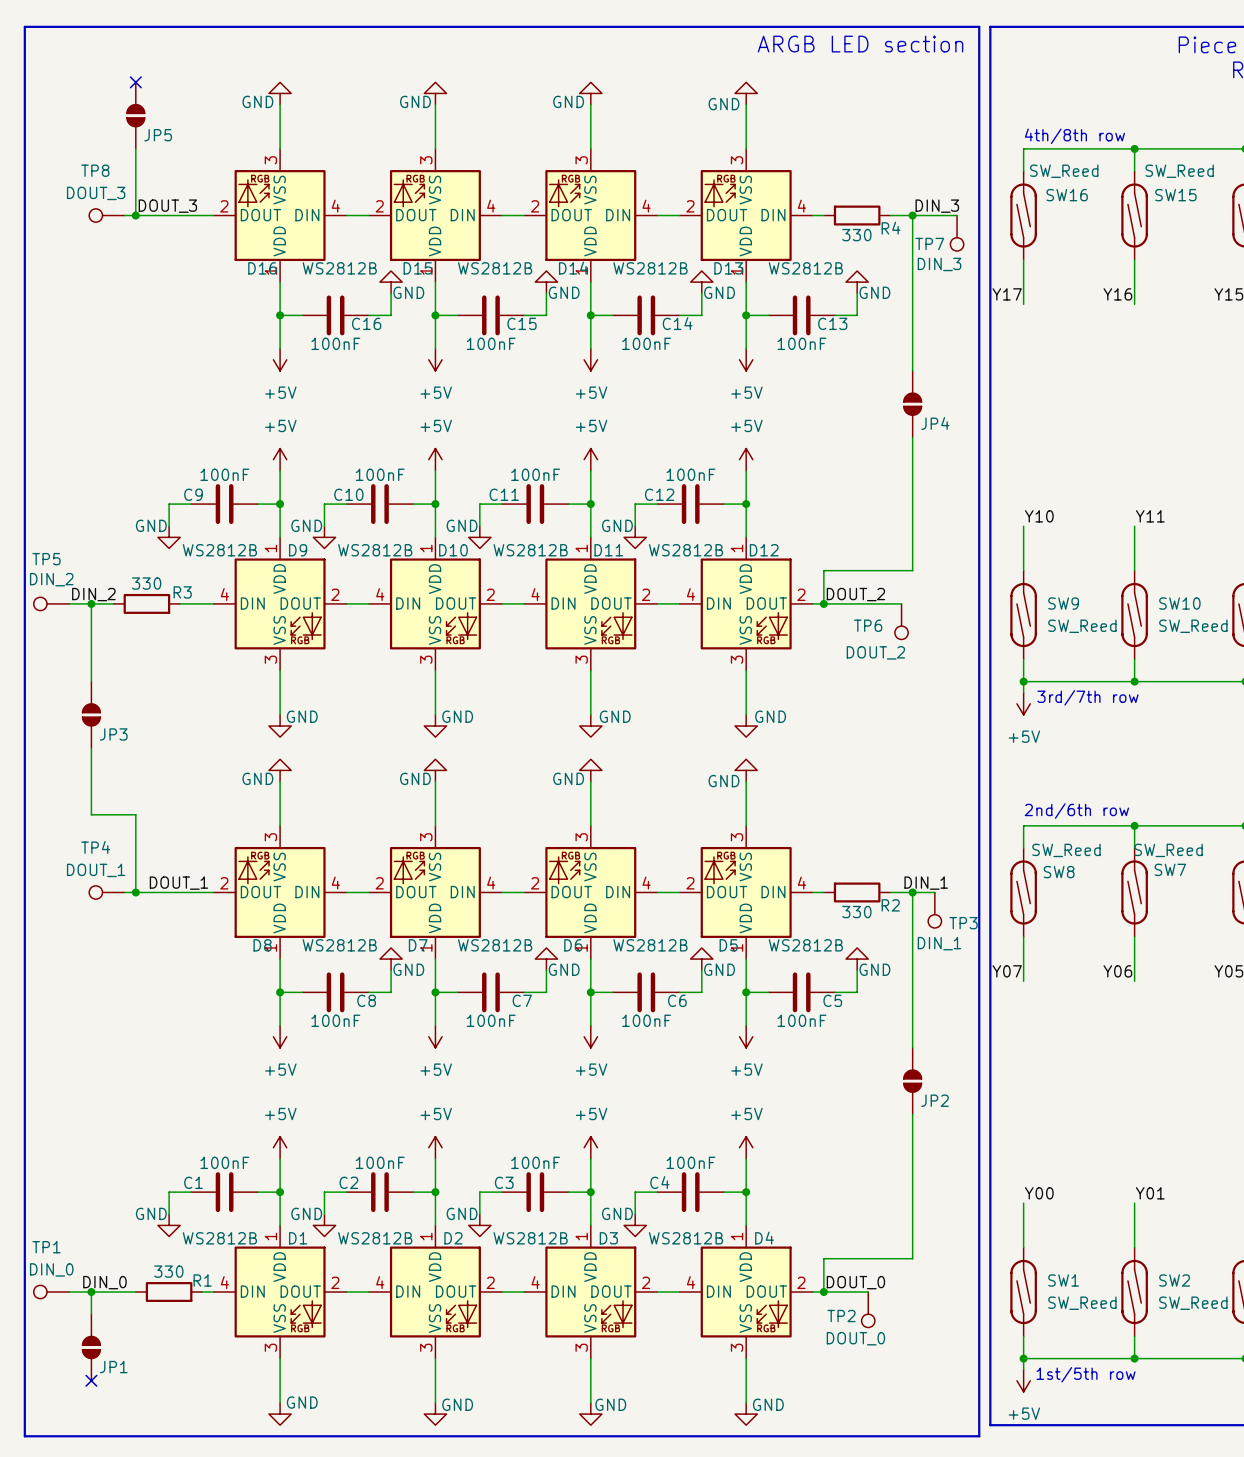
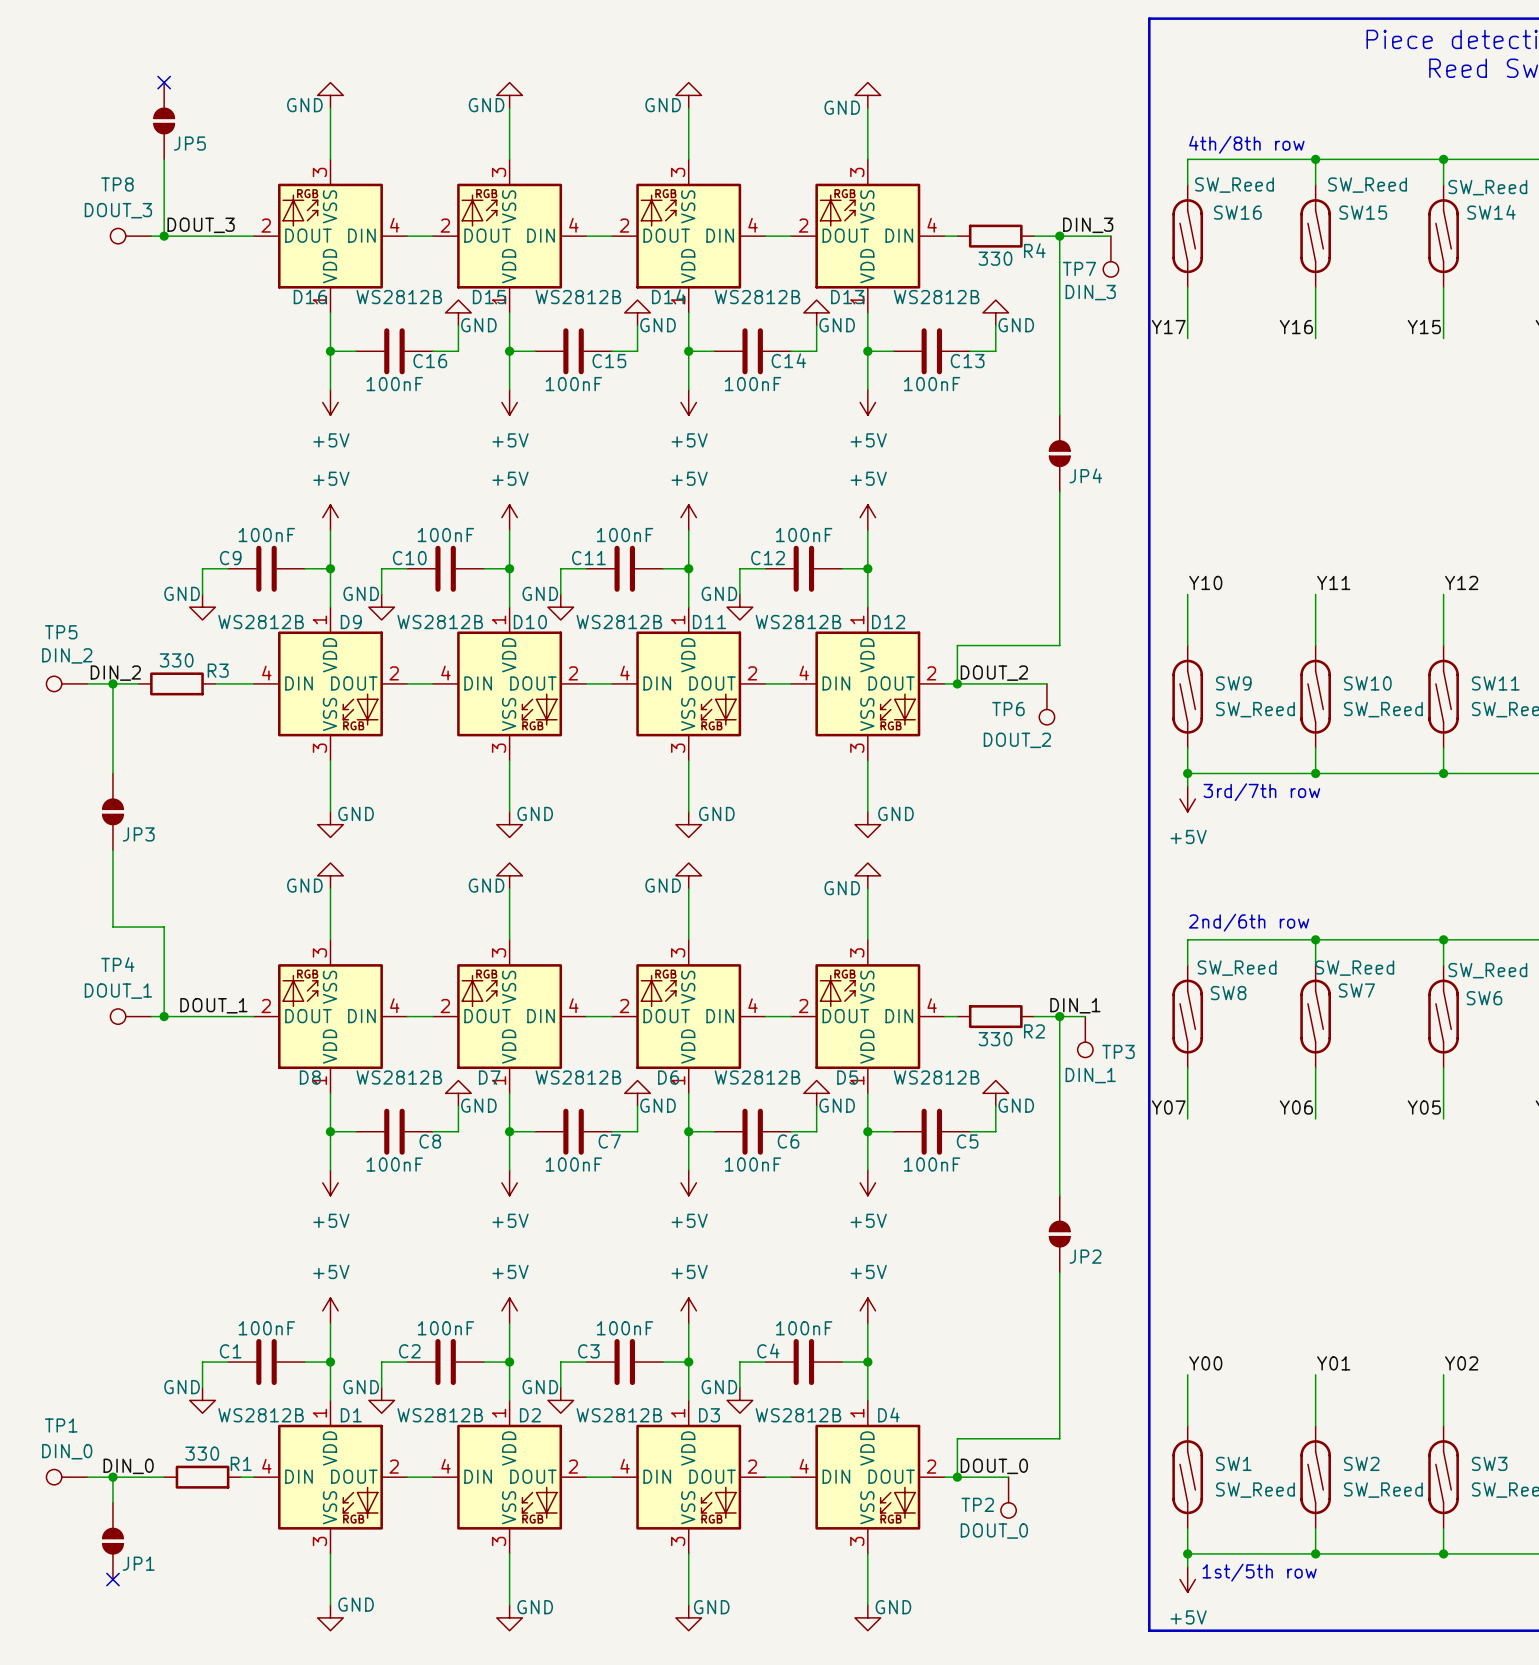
line: (24, 26) (979, 26) (979, 1436) (24, 1436) (24, 26) -> none
text: ARGB LED section (860, 44) -> none

